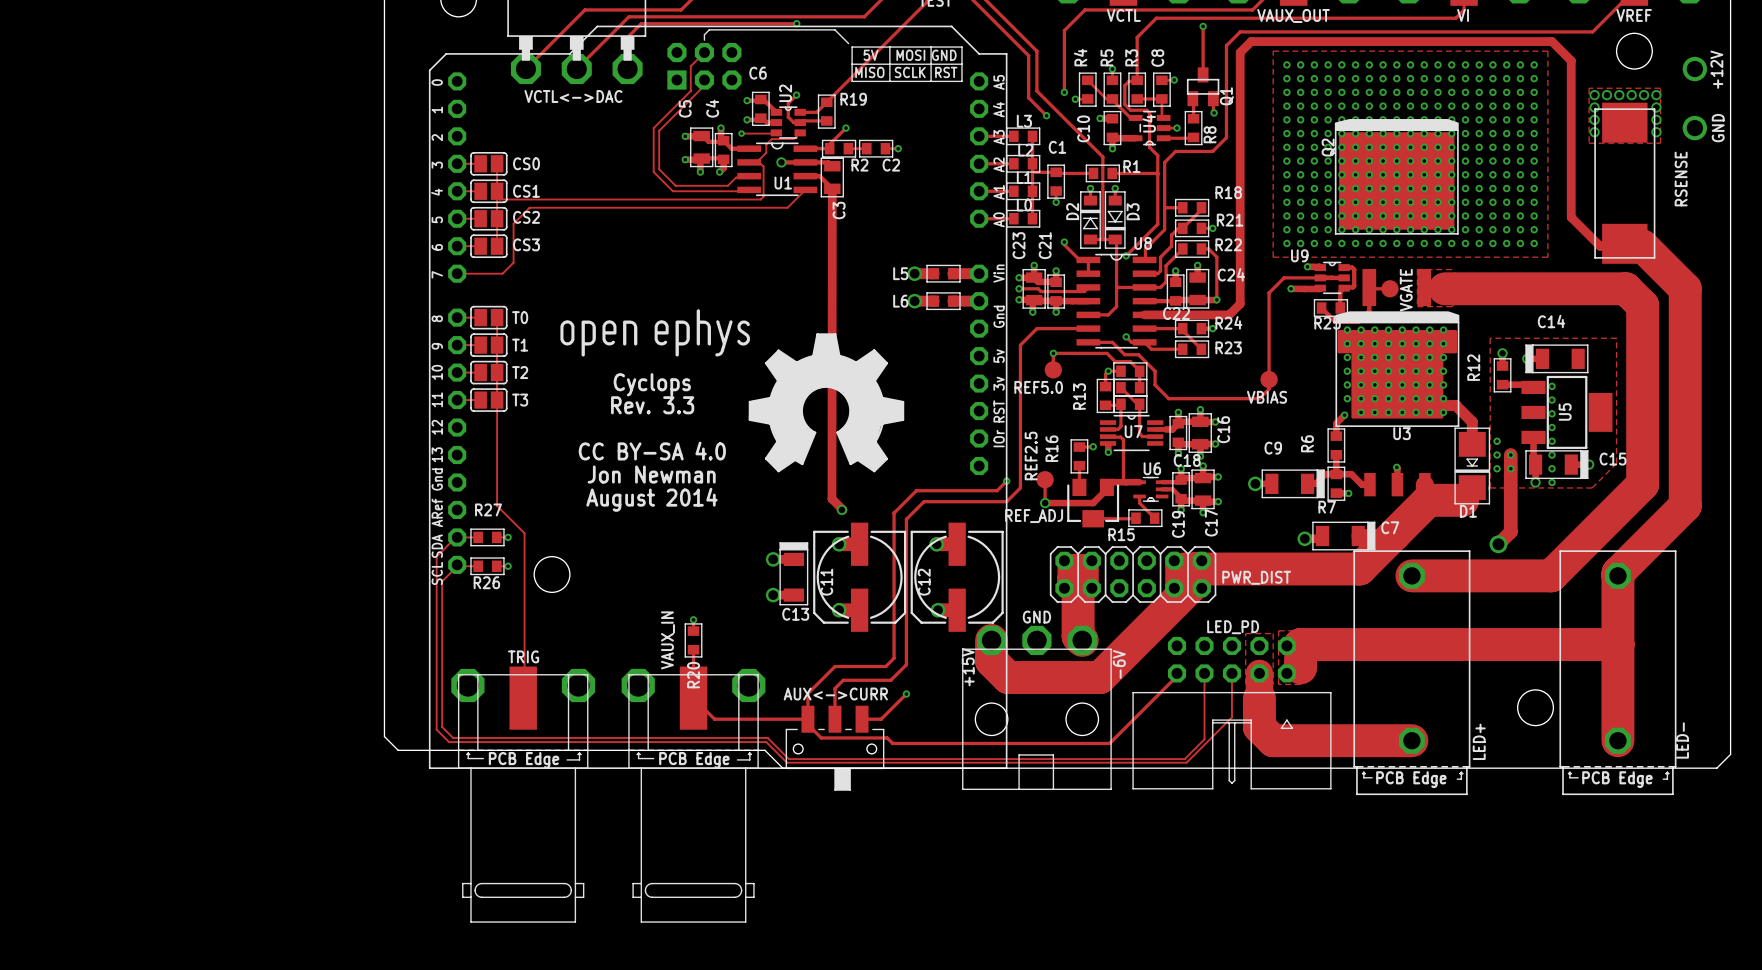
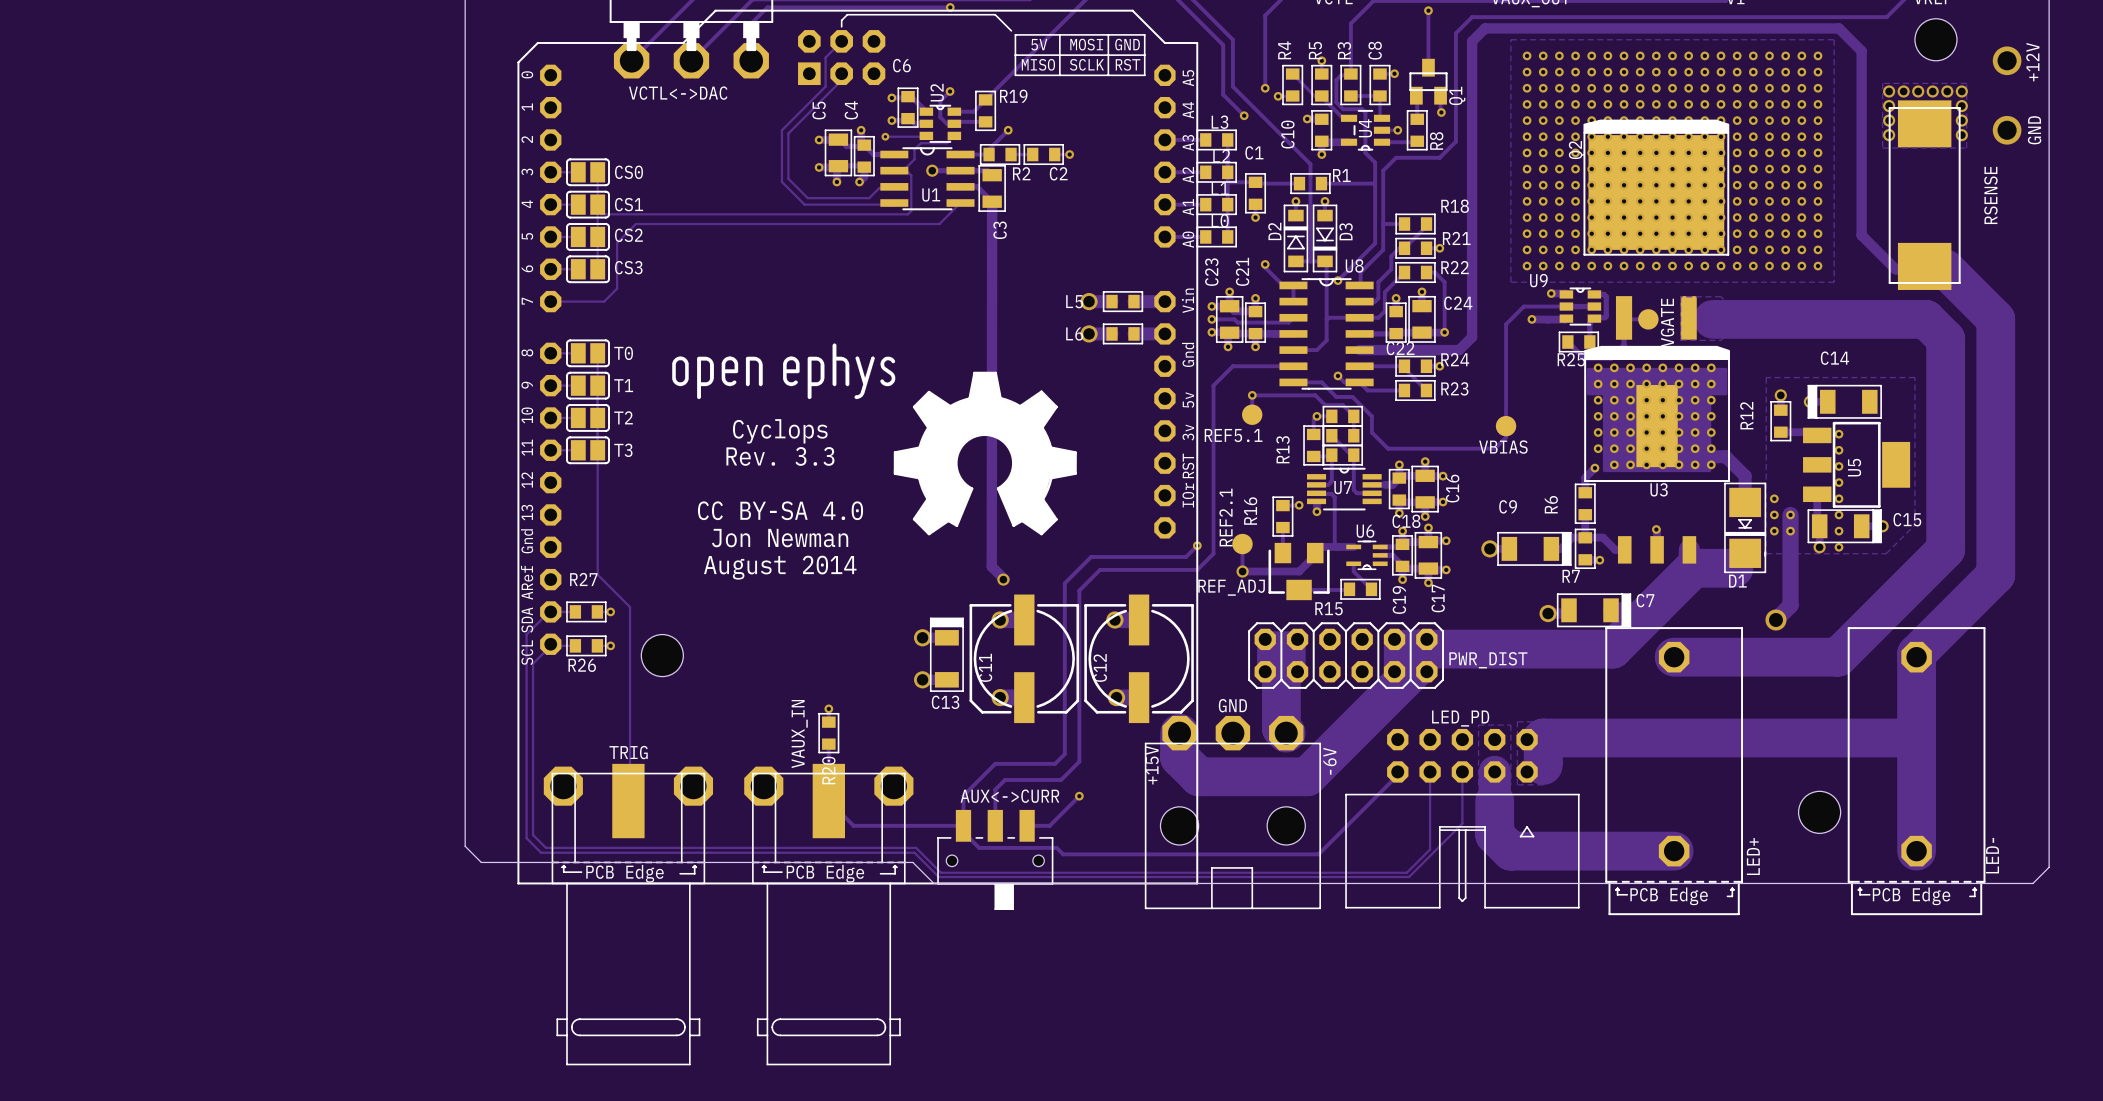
REF5.0 name: REF5.0 (1038, 387) -> REF5.1 (1233, 435)
REF2.5 name: REF2.5 (1031, 456) -> REF2.1 (1226, 517)

